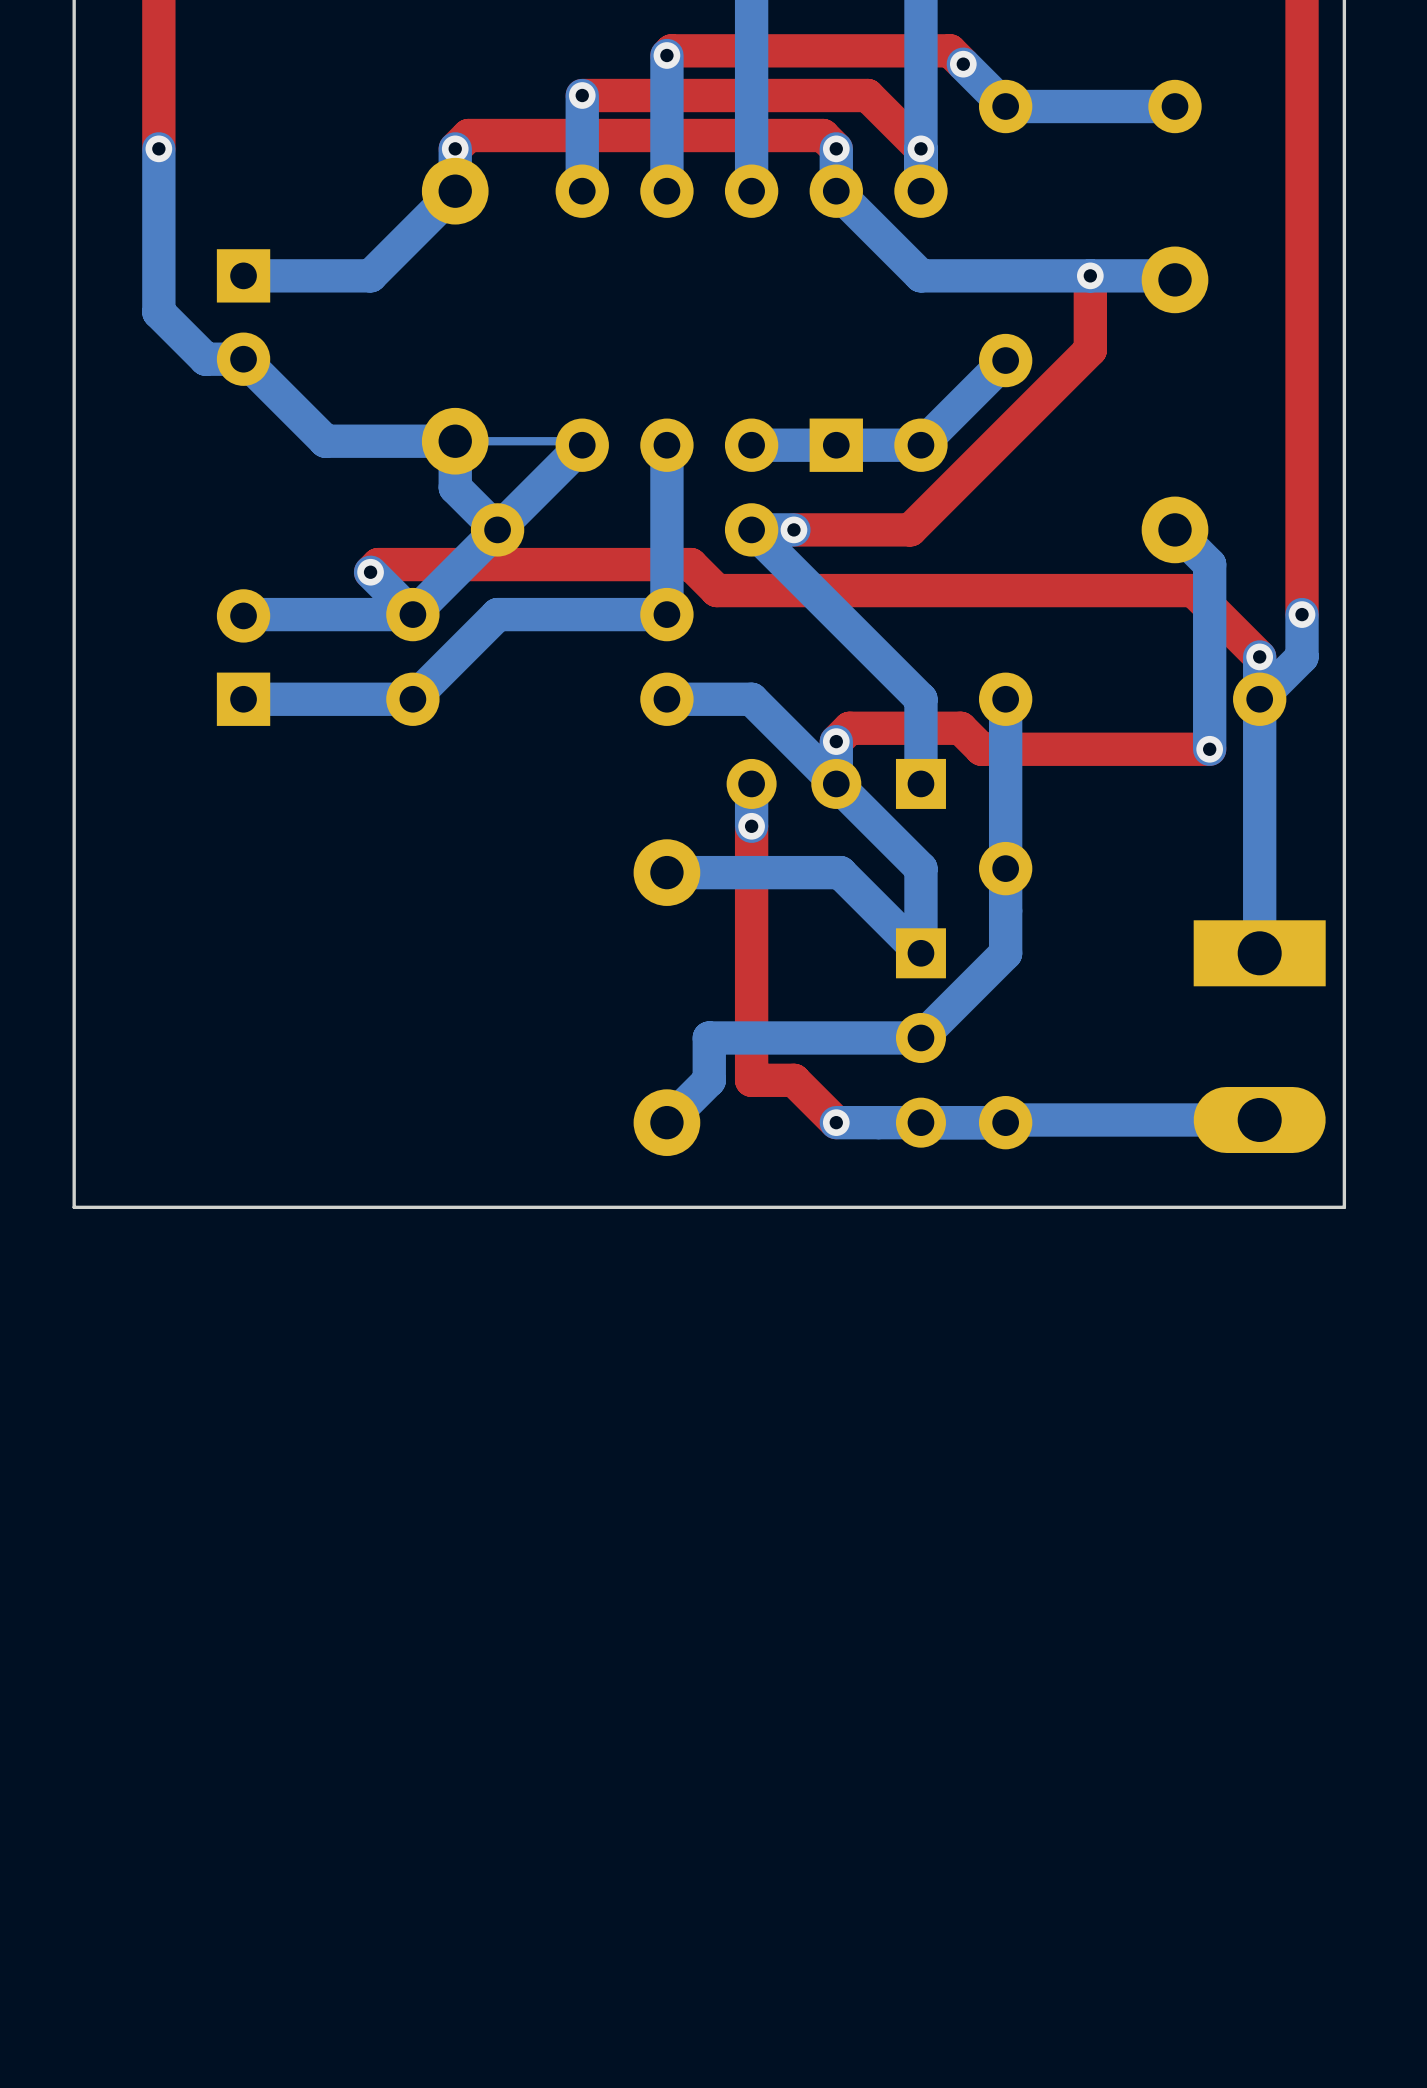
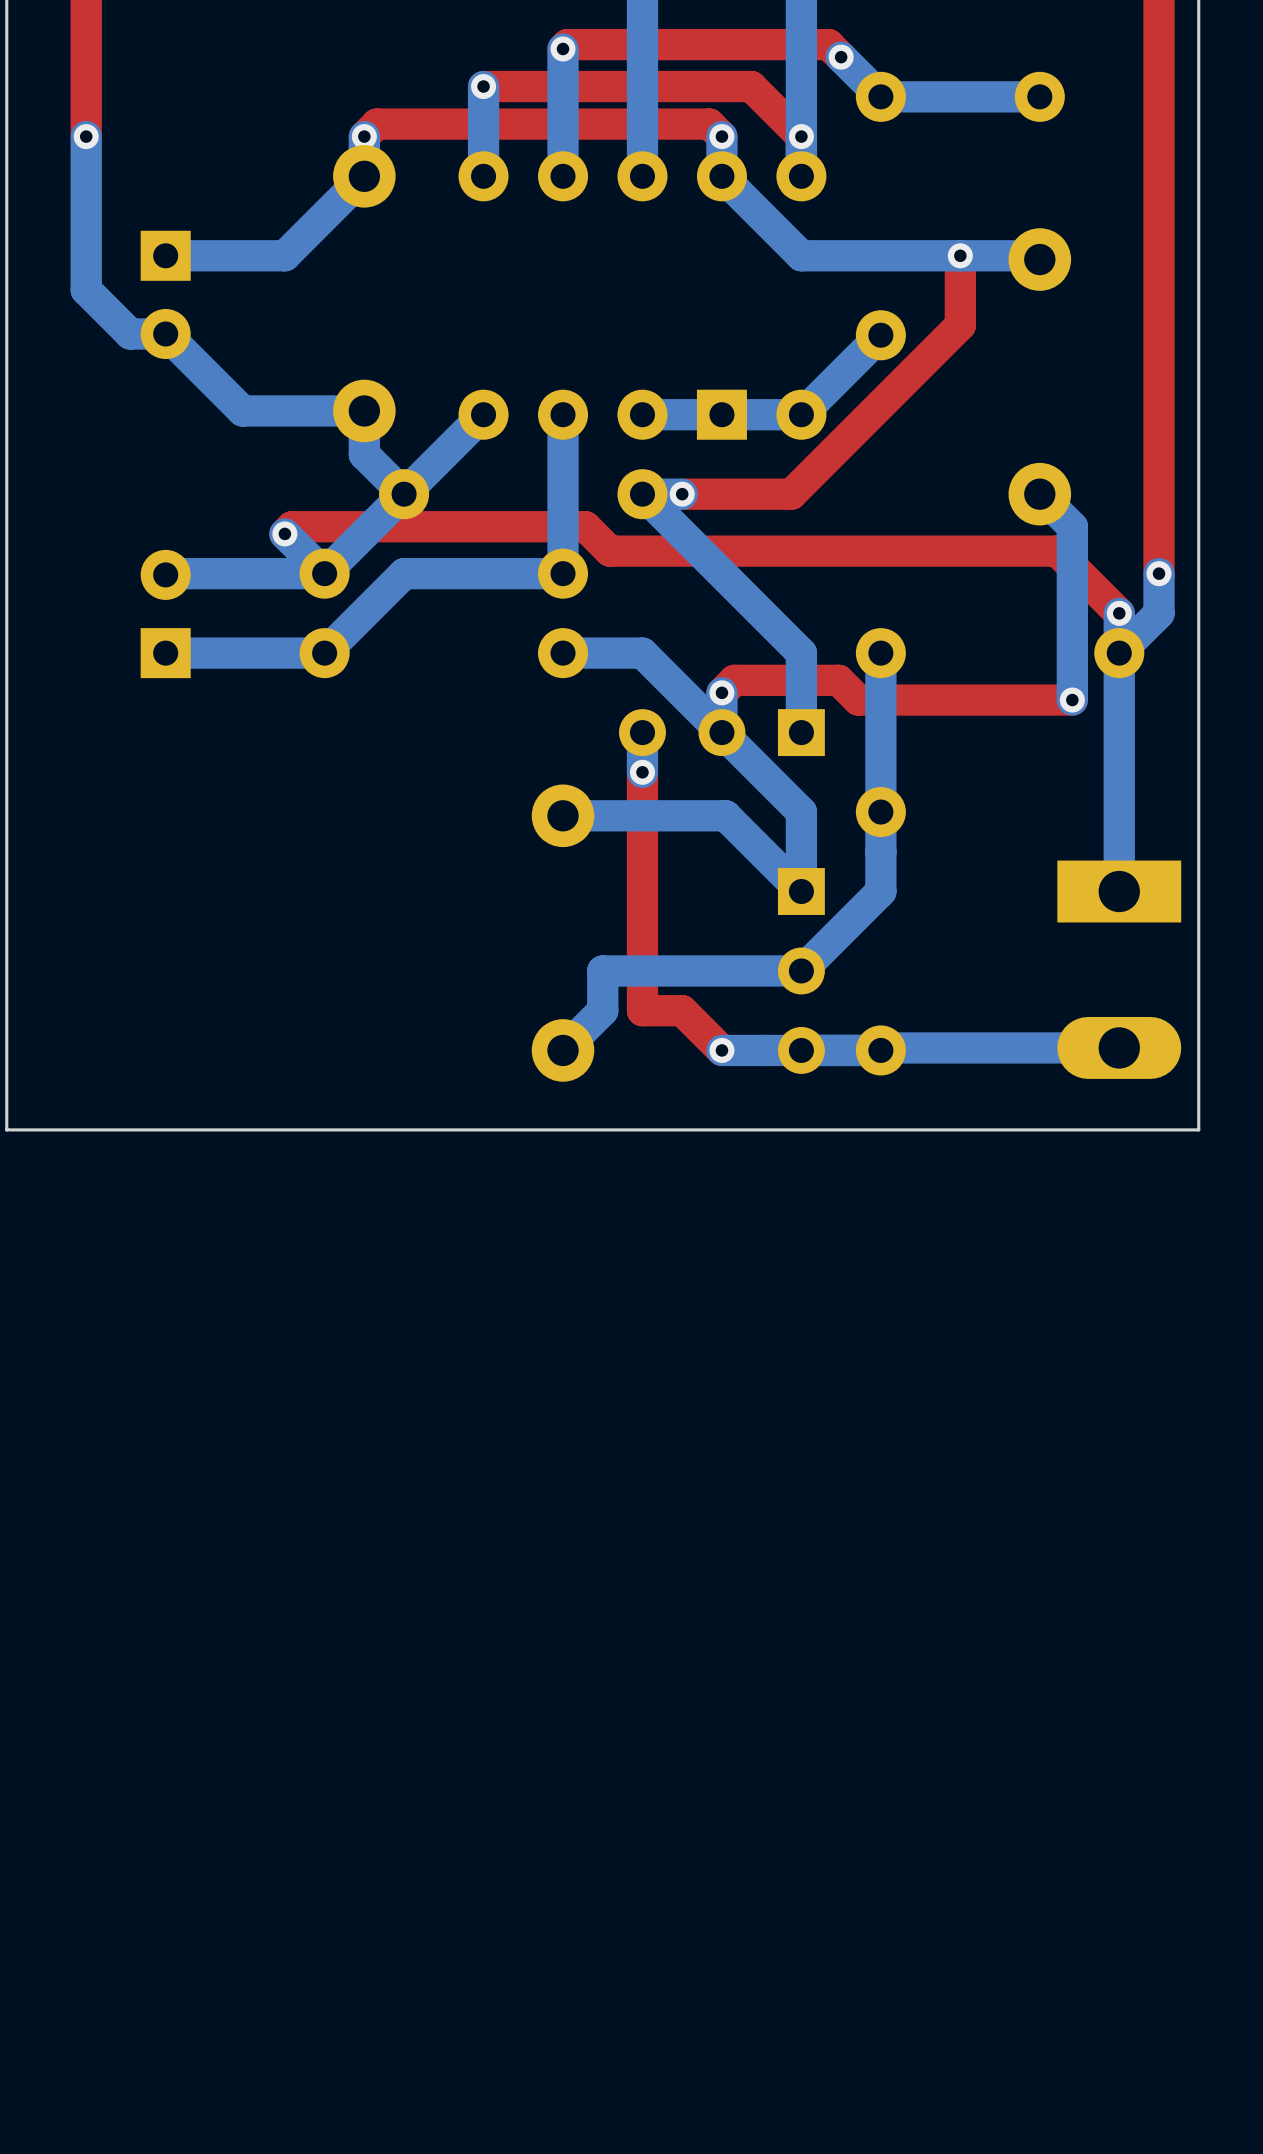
bottom track: (455, 441) (578, 441) (582, 445) -> none

